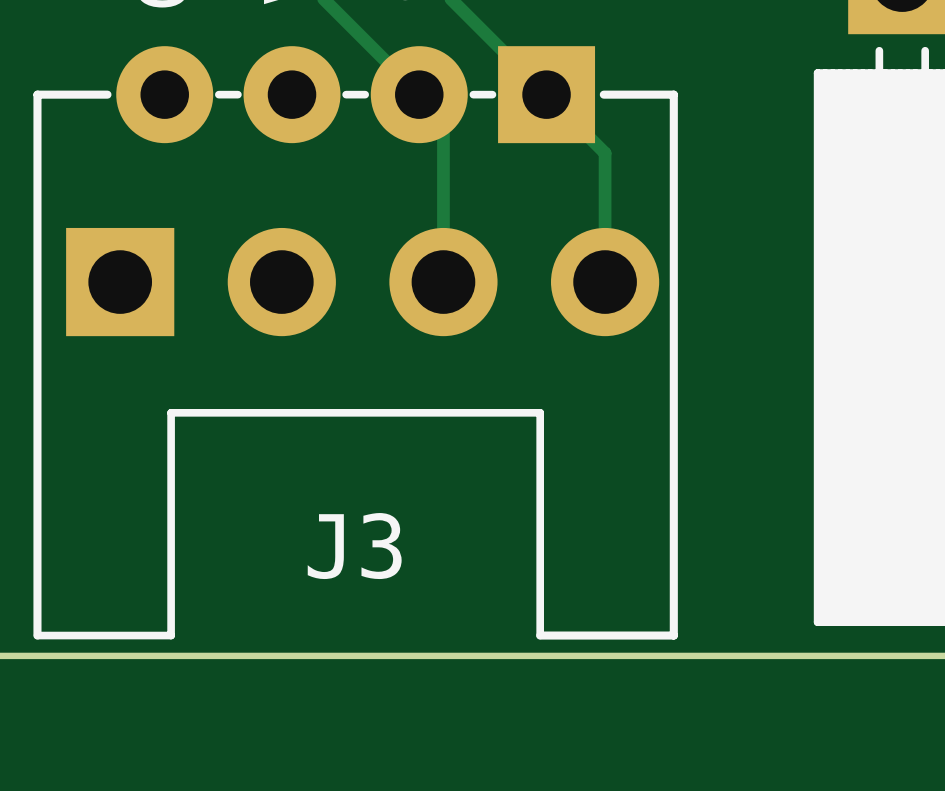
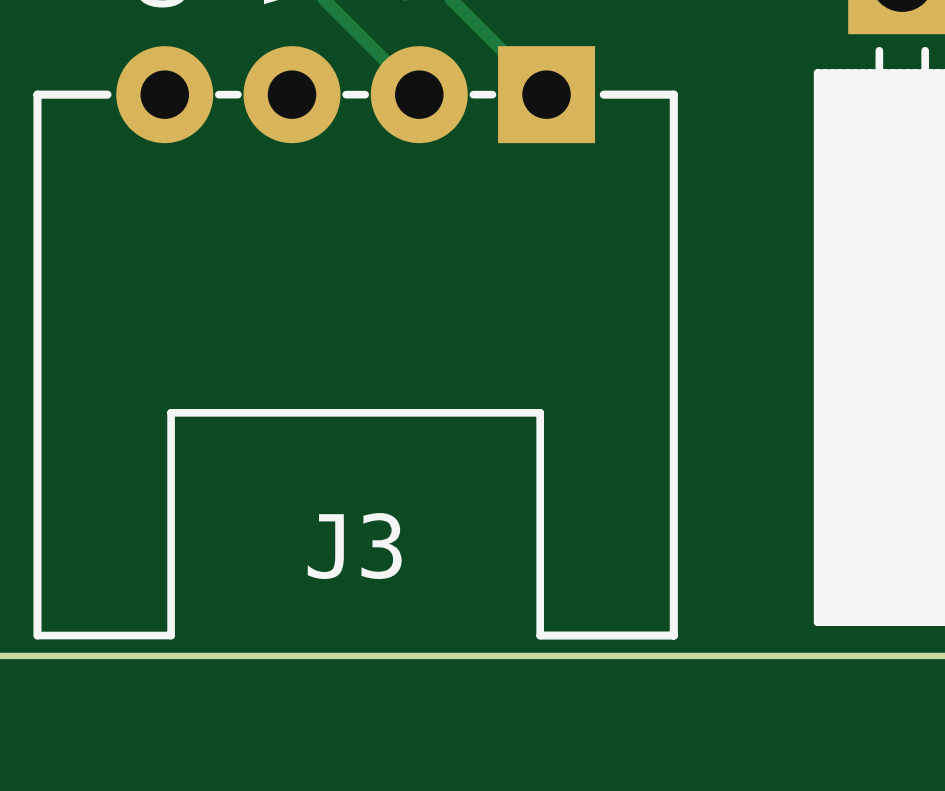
track: (419, 94) (443, 118) (443, 282) -> none
track: (546, 94) (605, 153) (605, 282) -> none
part: (362, 282) -> none

